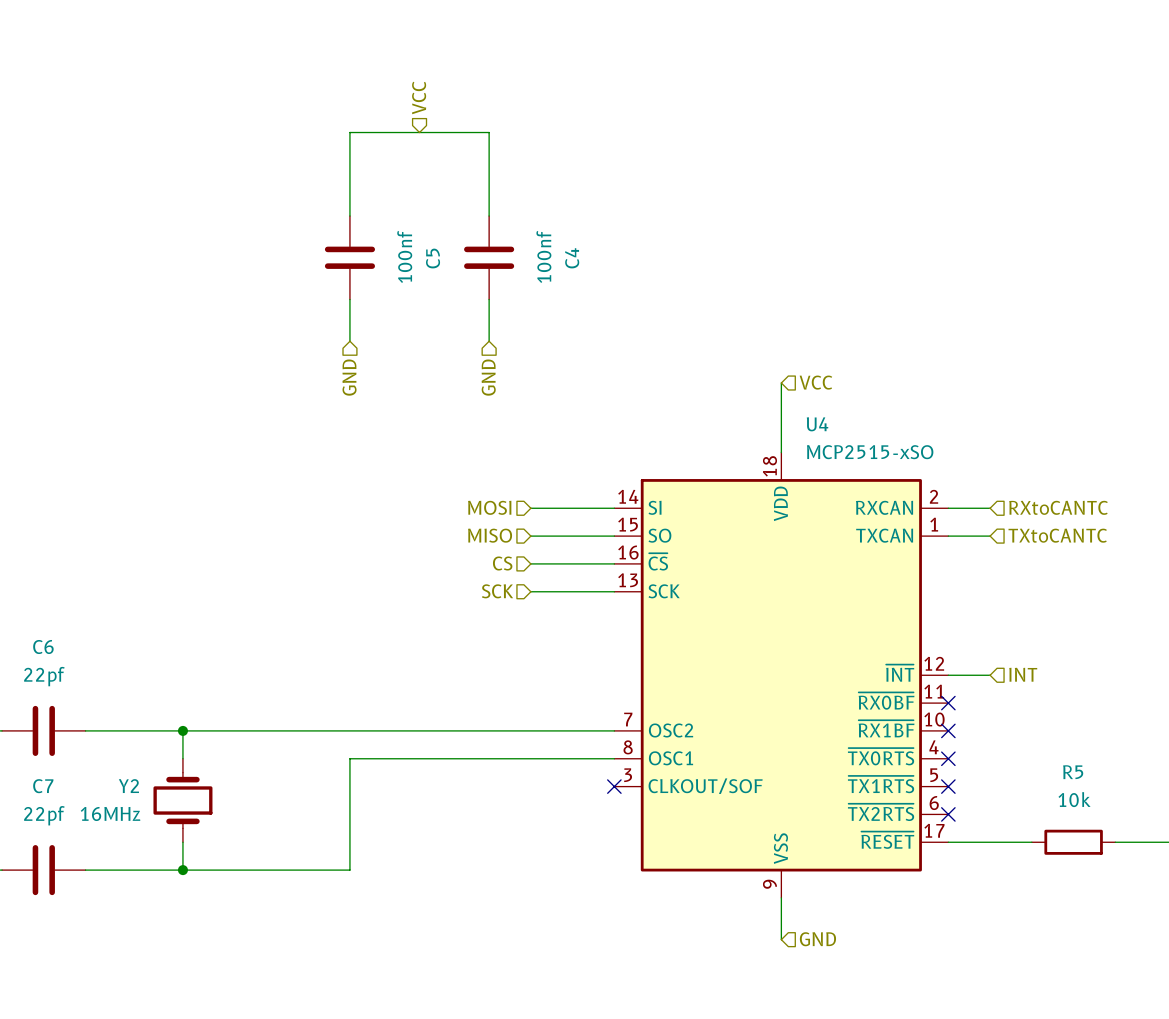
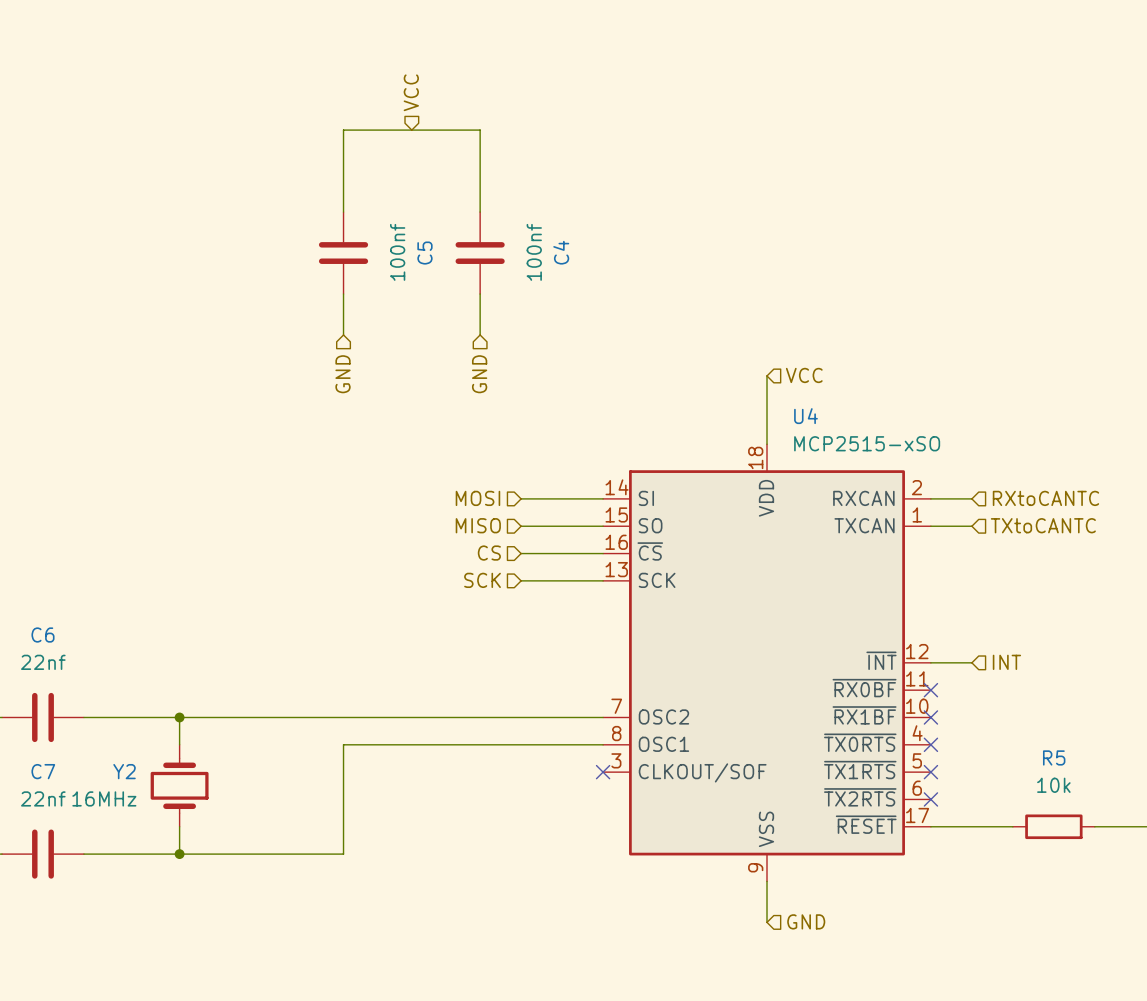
C6 value: 22pf (44, 676) -> 22nf (43, 662)
C7 value: 22pf (44, 815) -> 22nf (43, 798)

